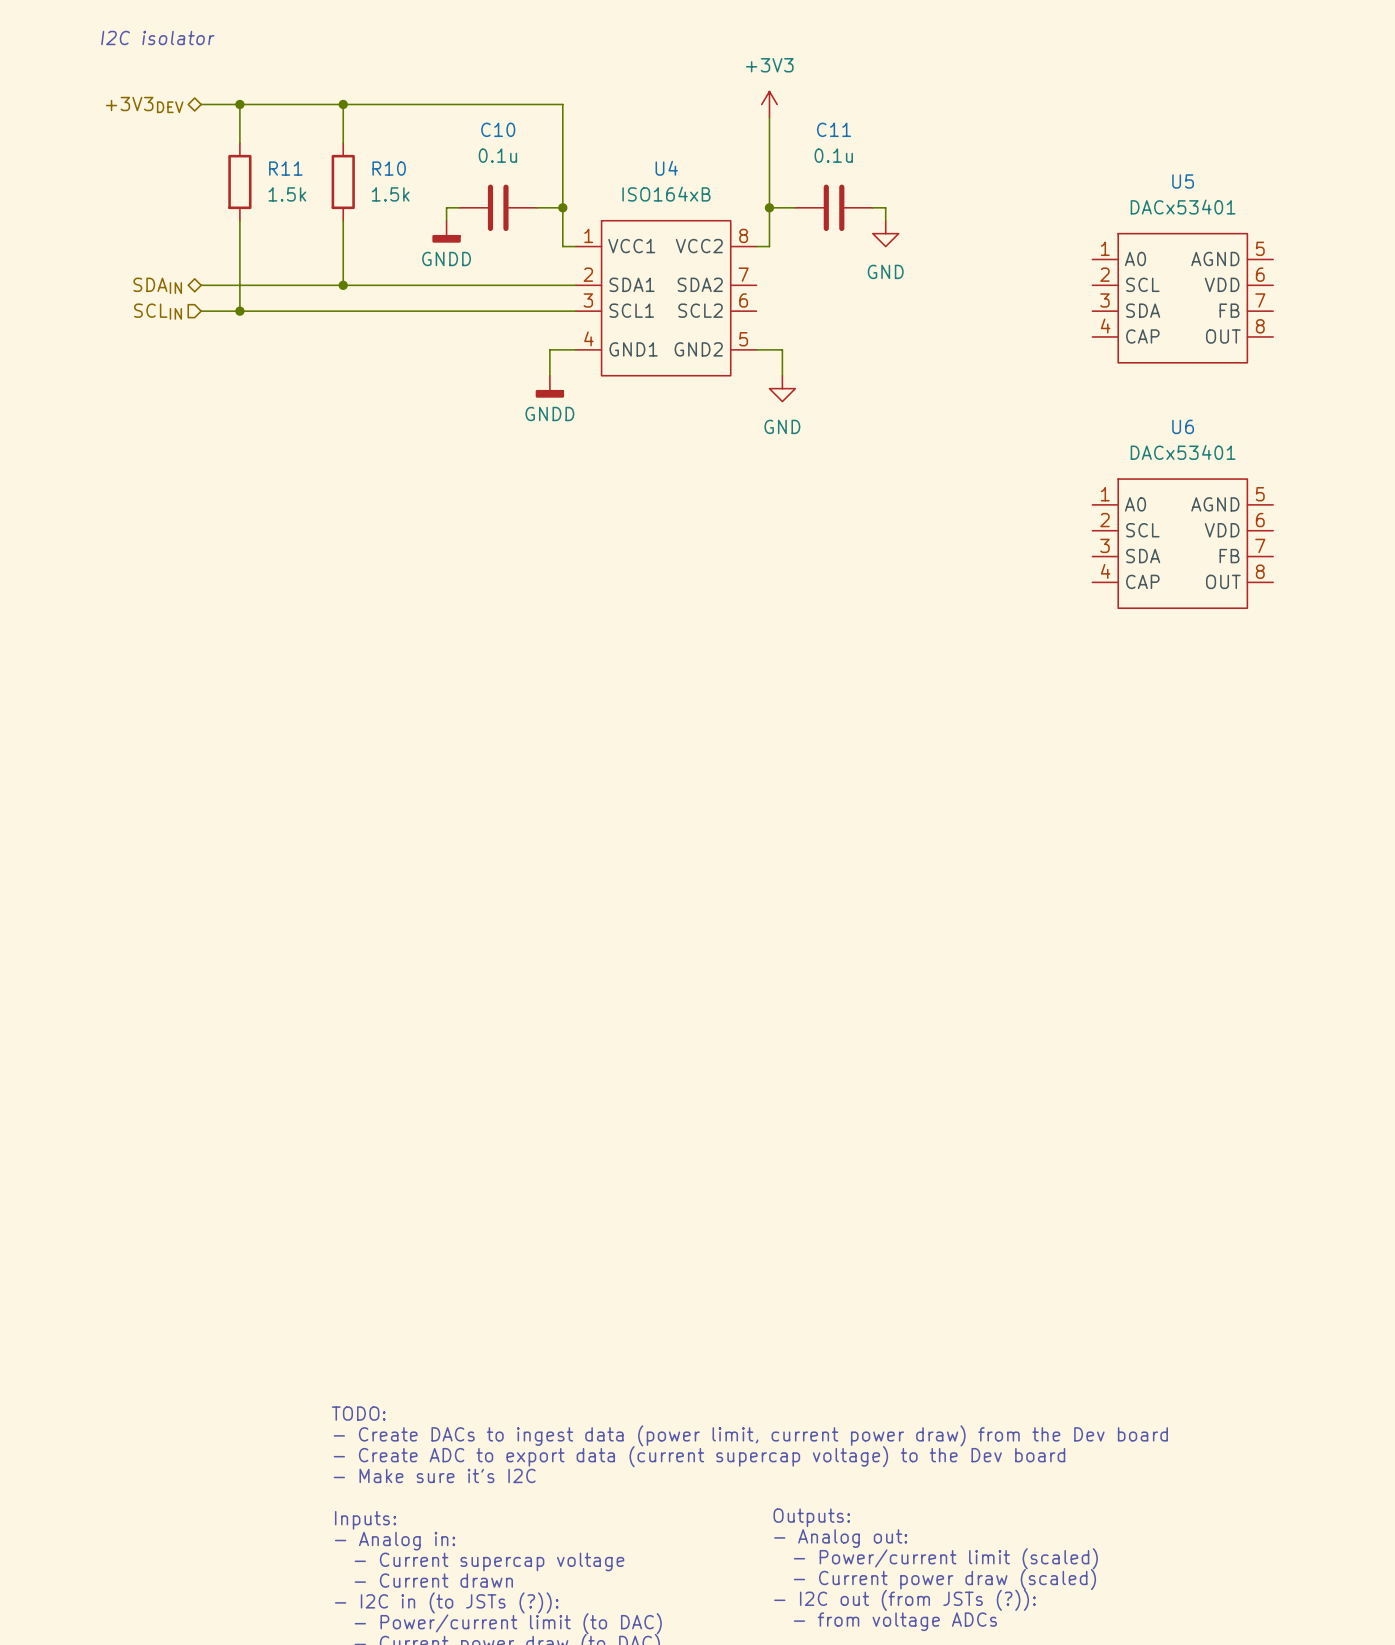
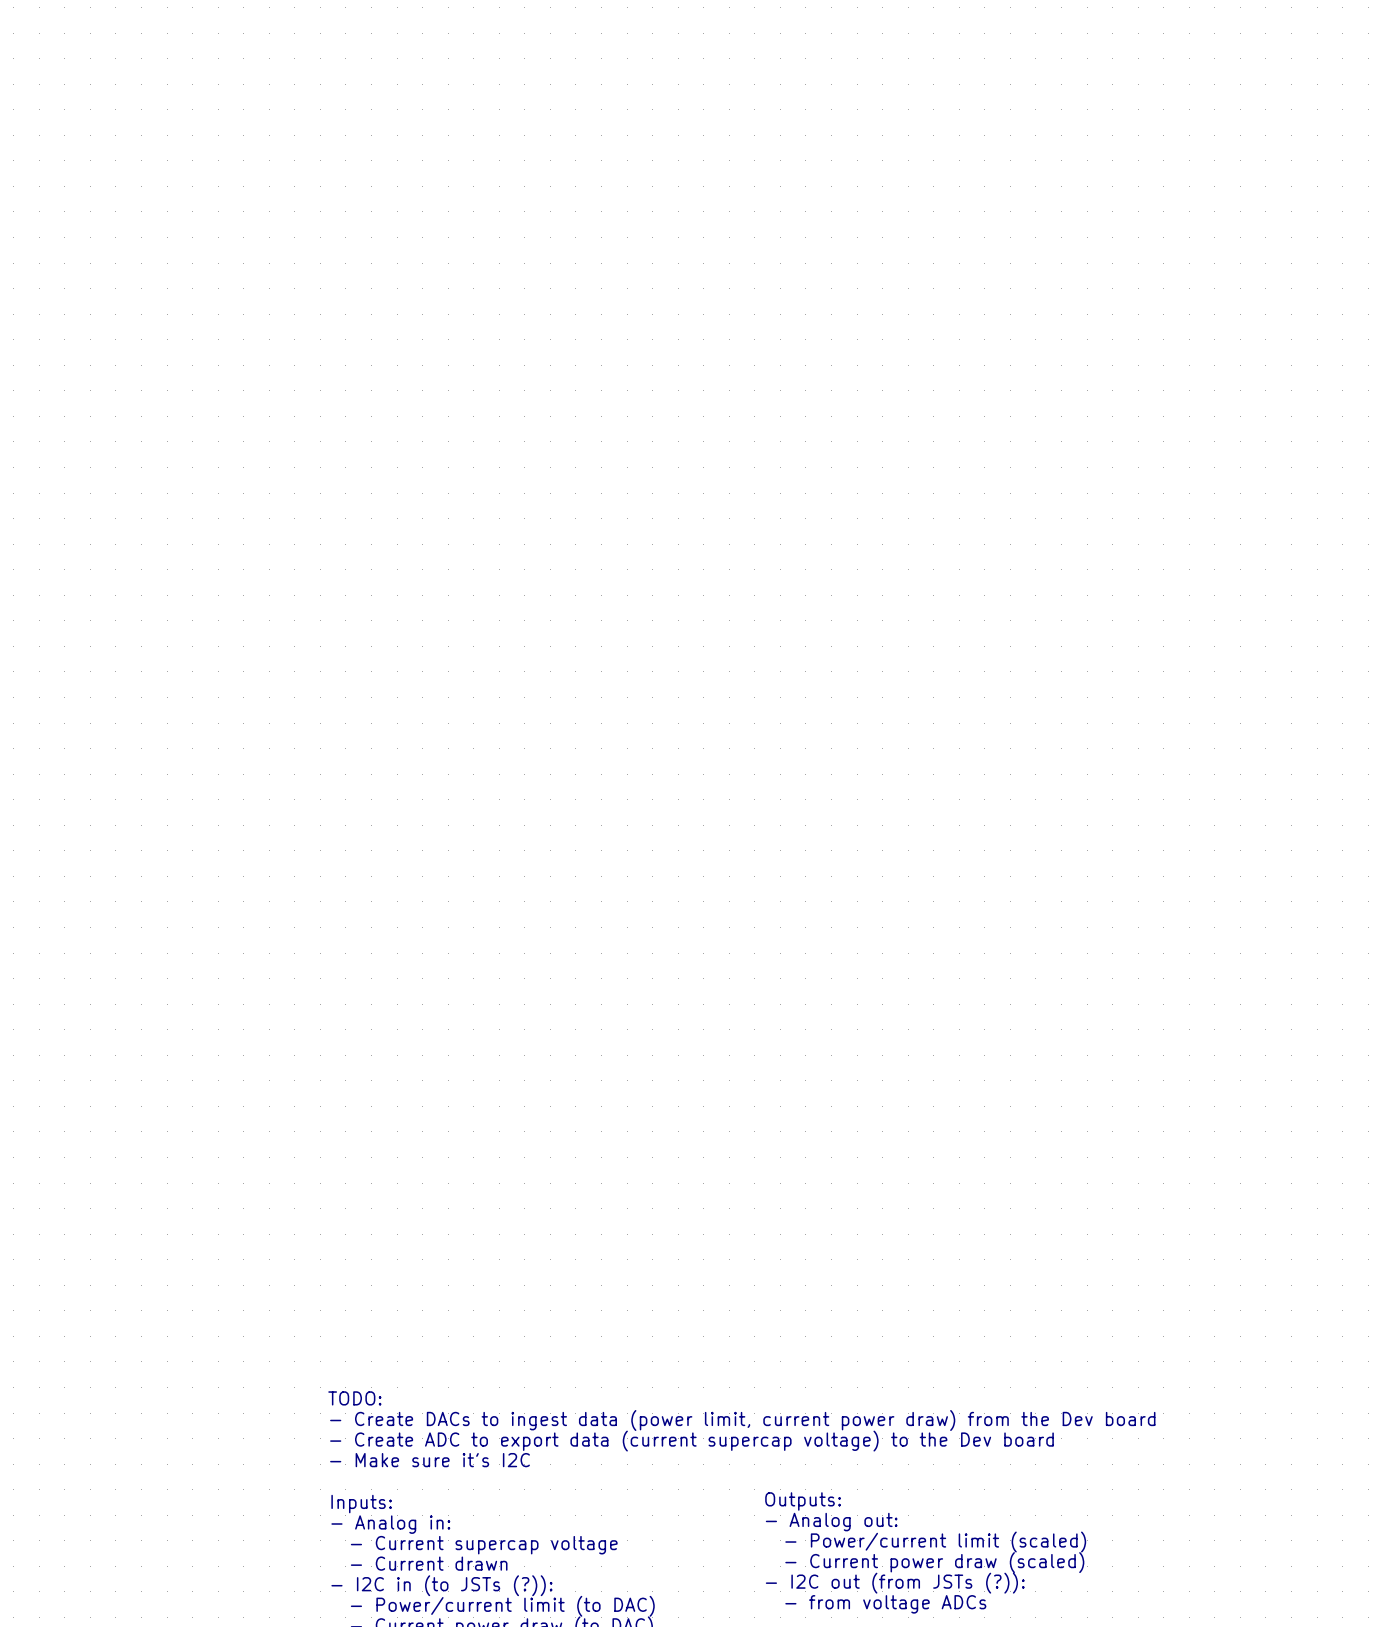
text: I2C isolator (157, 37) -> none
hierarchical label: +3V3DEV (144, 104) -> none
wire: (201, 104) (562, 104) (562, 246) (575, 246) -> none
wire: (239, 104) (239, 143) -> none
junction: (239, 104) -> none
wire: (343, 104) (343, 143) -> none
junction: (343, 104) -> none
power symbol: +3V3 (769, 104) -> none
wire: (769, 117) (769, 246) (756, 246) -> none
R11: 1.5k (239, 181) -> none
R10: 1.5k (343, 181) -> none
wire: (459, 207) (446, 207) (446, 220) -> none
C10: 0.1u (498, 207) -> none
wire: (536, 207) (562, 207) -> none
junction: (562, 207) -> none
wire: (769, 207) (795, 207) -> none
junction: (769, 207) -> none
C11: 0.1u (834, 207) -> none
wire: (872, 207) (885, 207) (885, 220) -> none
wire: (239, 220) (239, 311) -> none
wire: (343, 220) (343, 285) -> none
power symbol: GNDD (446, 231) -> none
power symbol: GND (885, 233) -> none
hierarchical label: SDAIN (157, 285) -> none
wire: (201, 285) (575, 285) -> none
junction: (343, 285) -> none
U4: ISO164xB (666, 298) -> none
U5: DACx53401 (1182, 298) -> none
hierarchical label: SCLIN (158, 311) -> none
wire: (201, 311) (575, 311) -> none
junction: (239, 311) -> none
wire: (575, 349) (549, 349) (549, 375) -> none
wire: (756, 349) (782, 349) (782, 375) -> none
power symbol: GNDD (549, 386) -> none
power symbol: GND (782, 388) -> none
U6: DACx53401 (1182, 543) -> none

